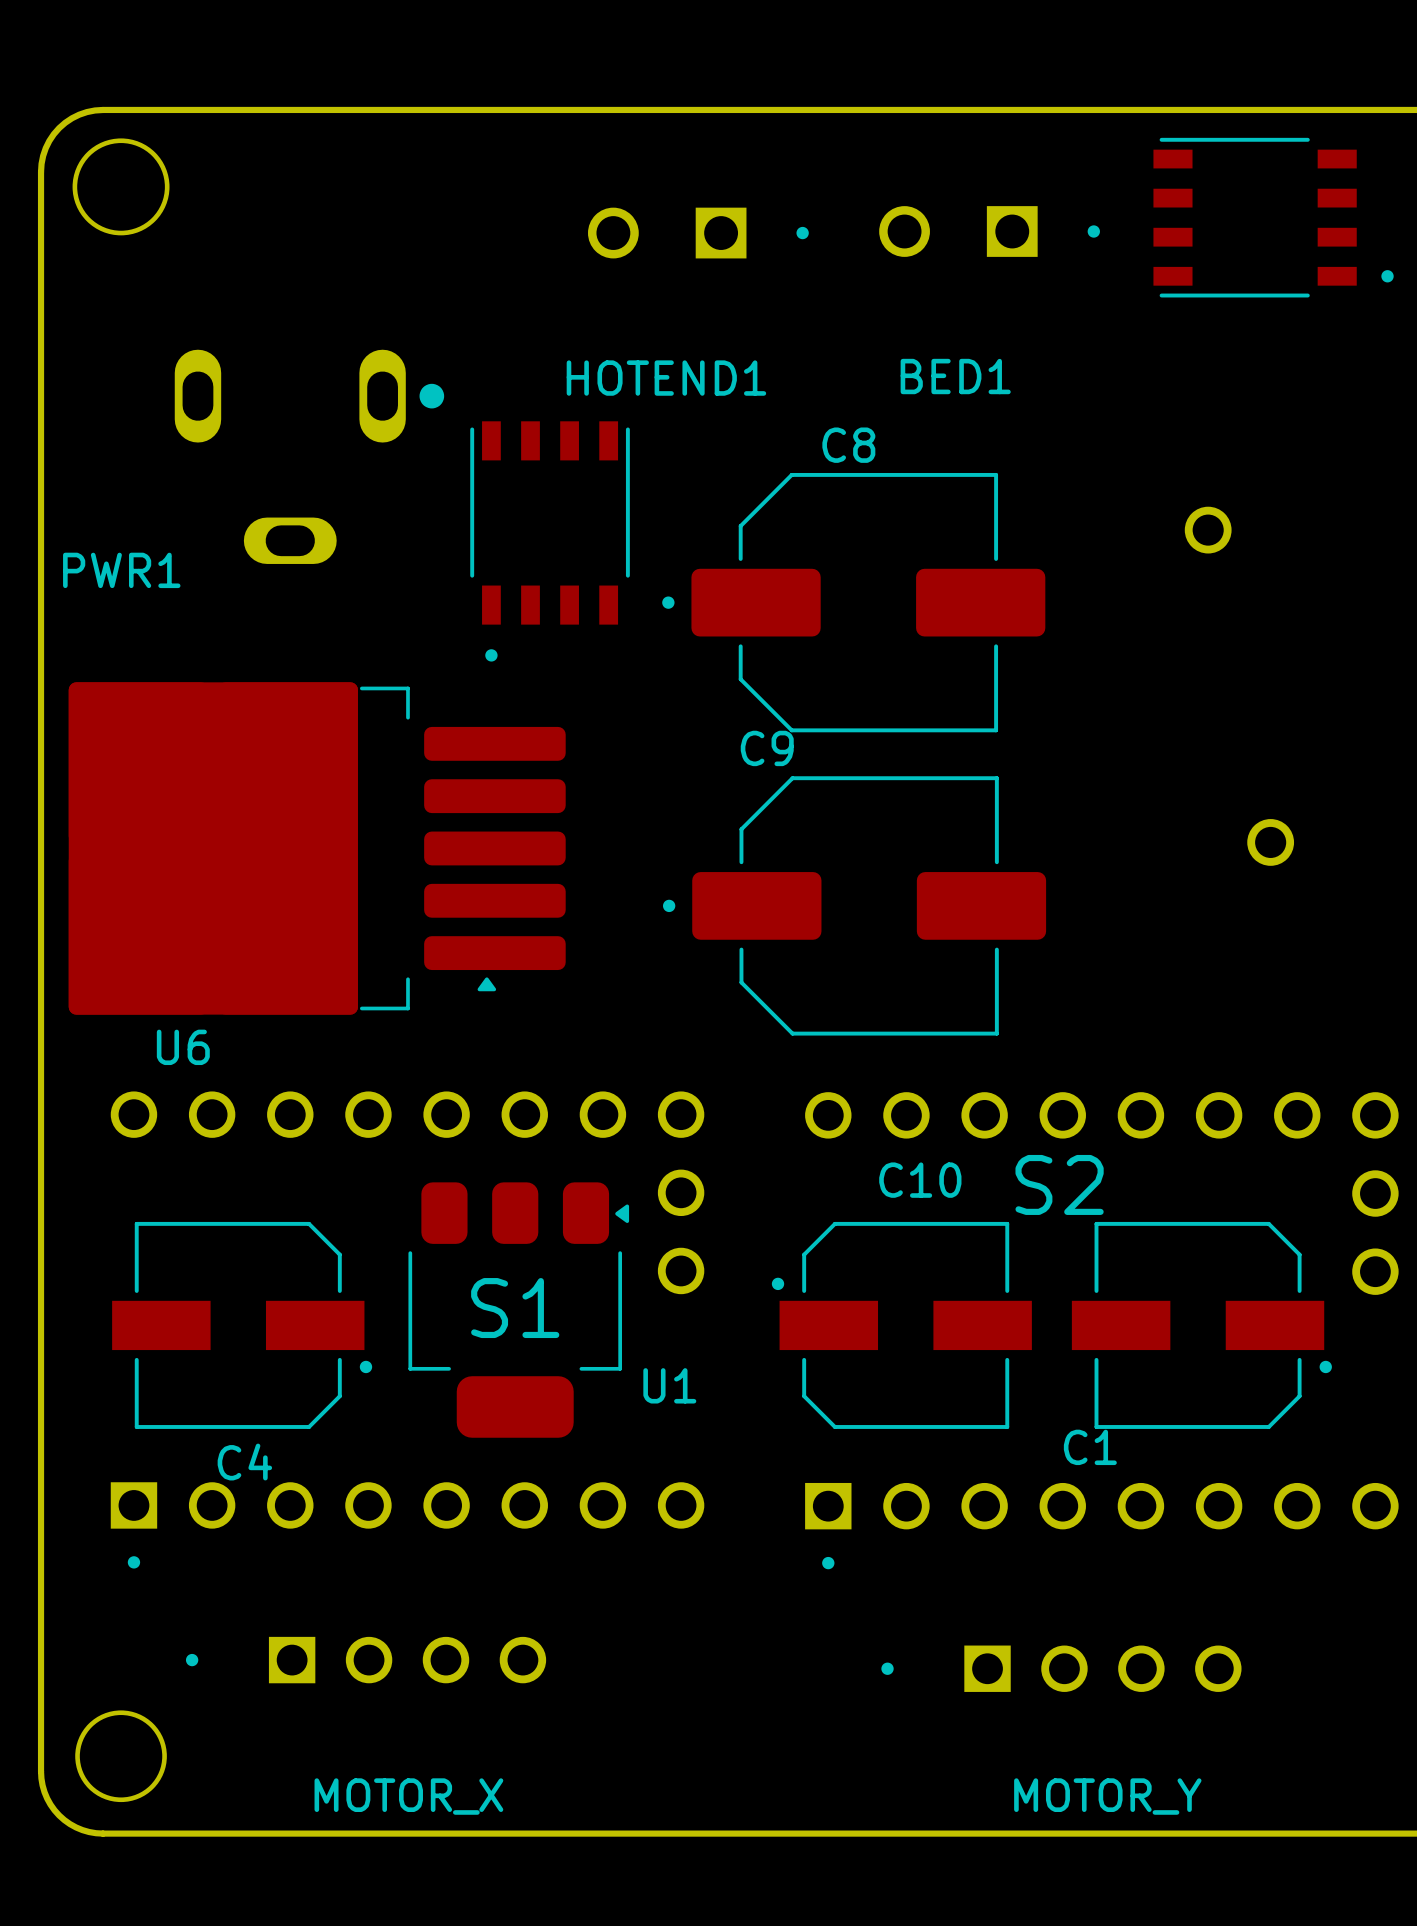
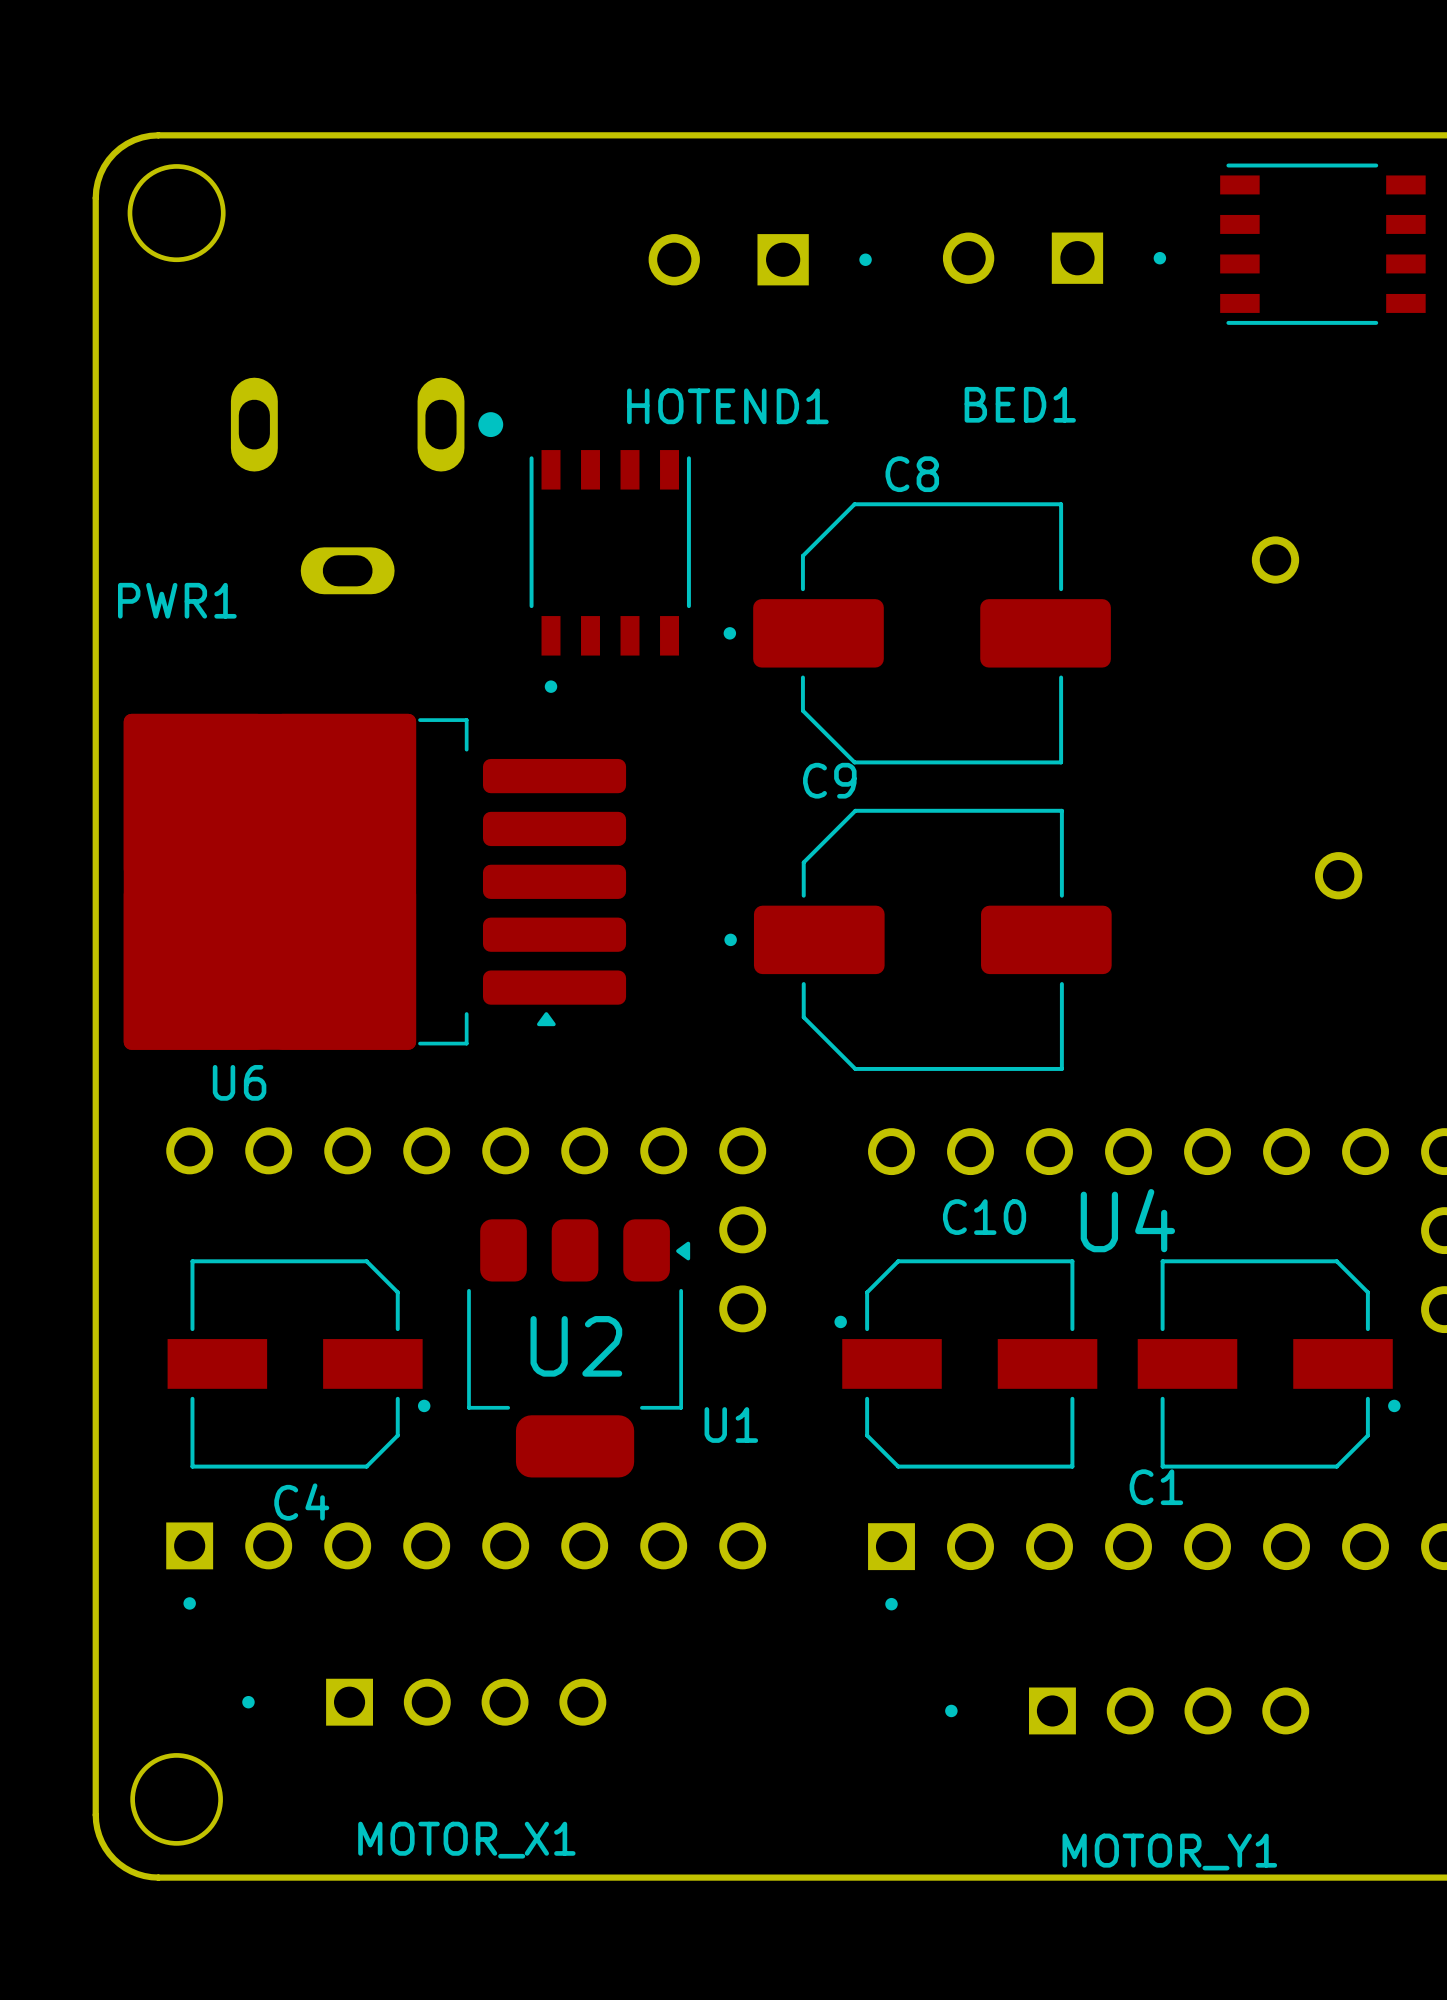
S2 name: S2 (1059, 1184) -> U4 (1127, 1220)
S1 name: S1 (515, 1308) -> U2 (576, 1346)
MOTOR_X name: MOTOR_X (408, 1796) -> MOTOR_X1 (466, 1840)
MOTOR_Y name: MOTOR_Y (1107, 1796) -> MOTOR_Y1 (1169, 1852)

